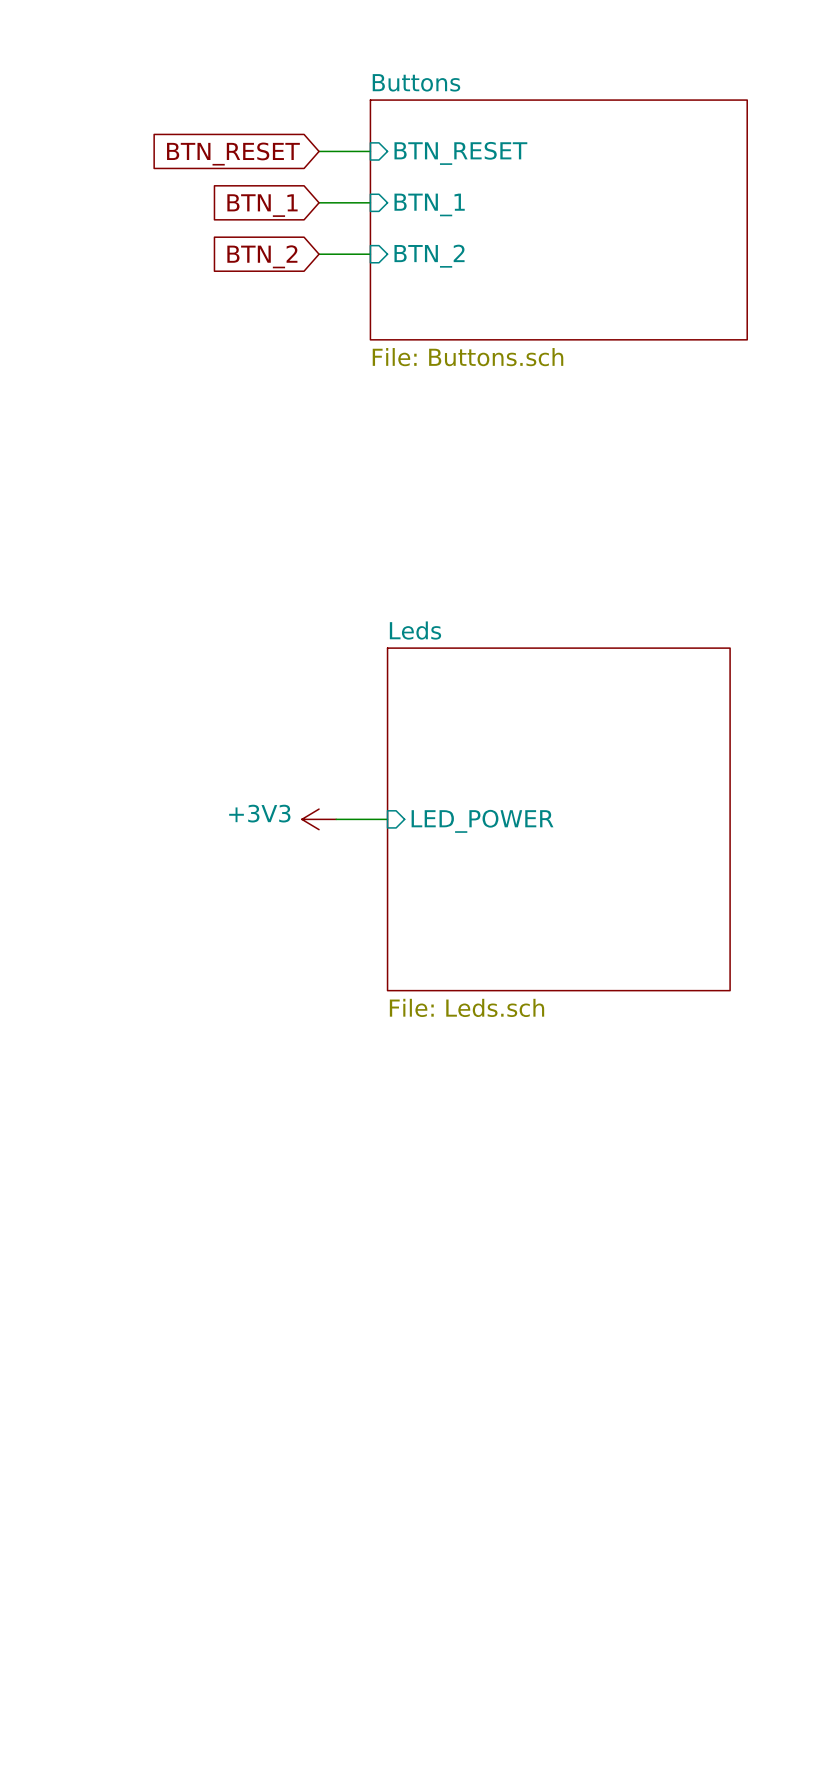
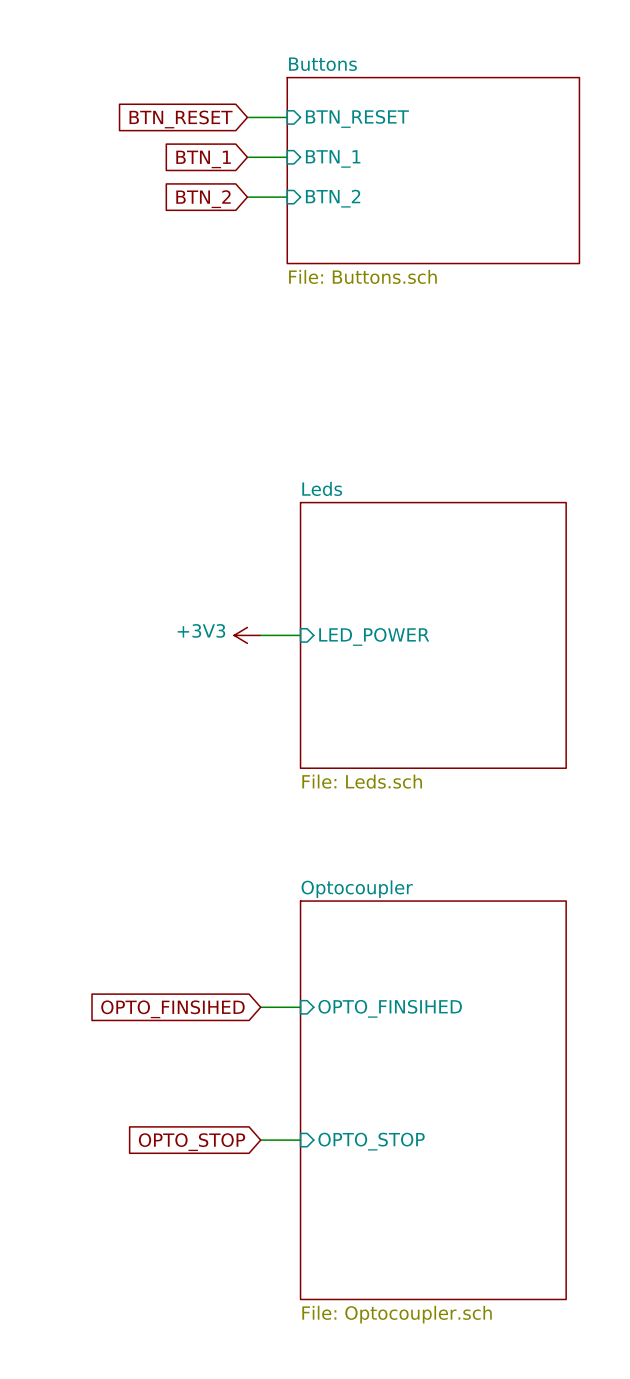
wire: none -> (260, 1007) (300, 1007)
sheet pin: none -> OPTO_FINSIHED (390, 1008)
global label: none -> OPTO_FINSIHED (172, 1009)
sheet Optocoupler: none -> File: Optocoupler.sch (433, 1100)
wire: none -> (260, 1140) (300, 1140)
global label: none -> OPTO_STOP (192, 1142)
sheet pin: none -> OPTO_STOP (371, 1141)

